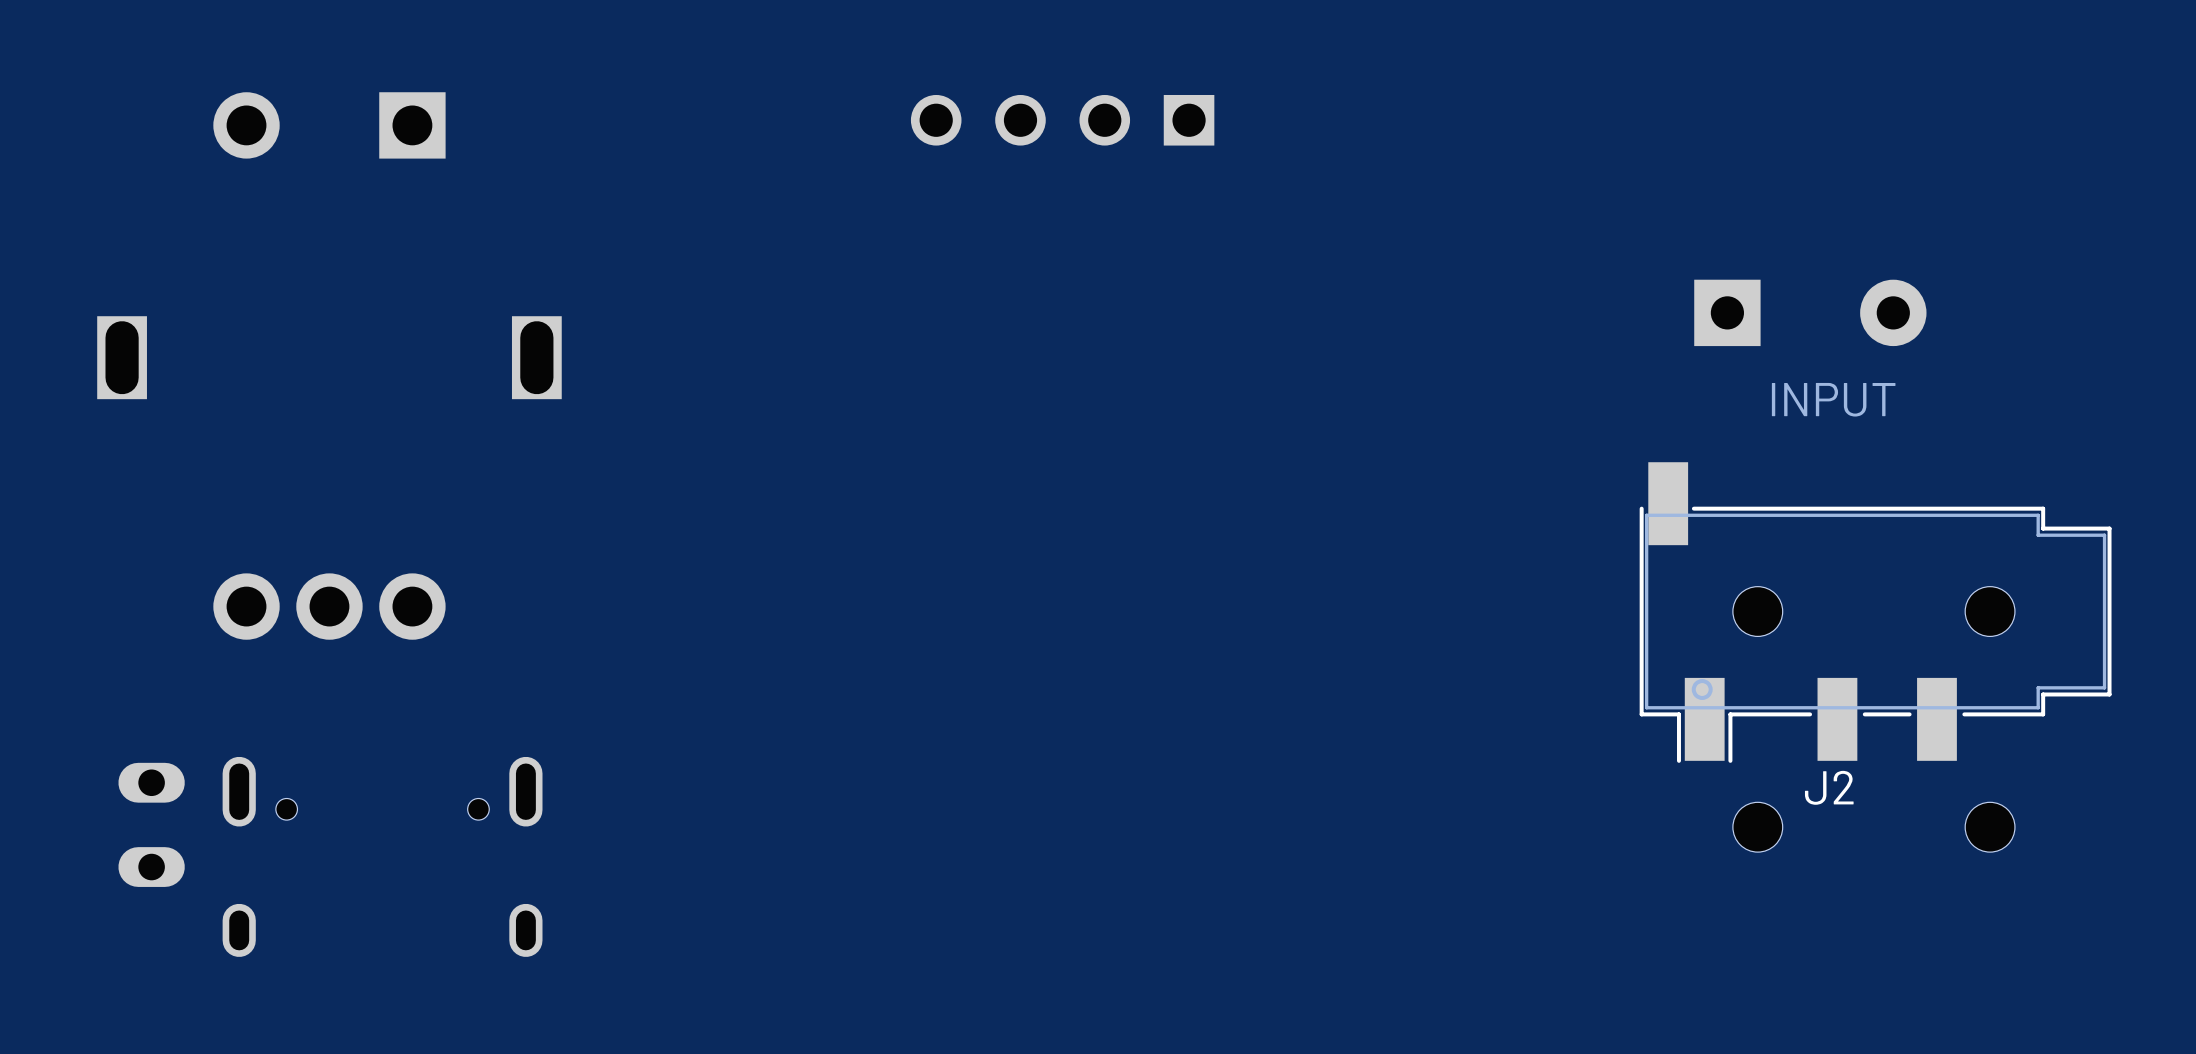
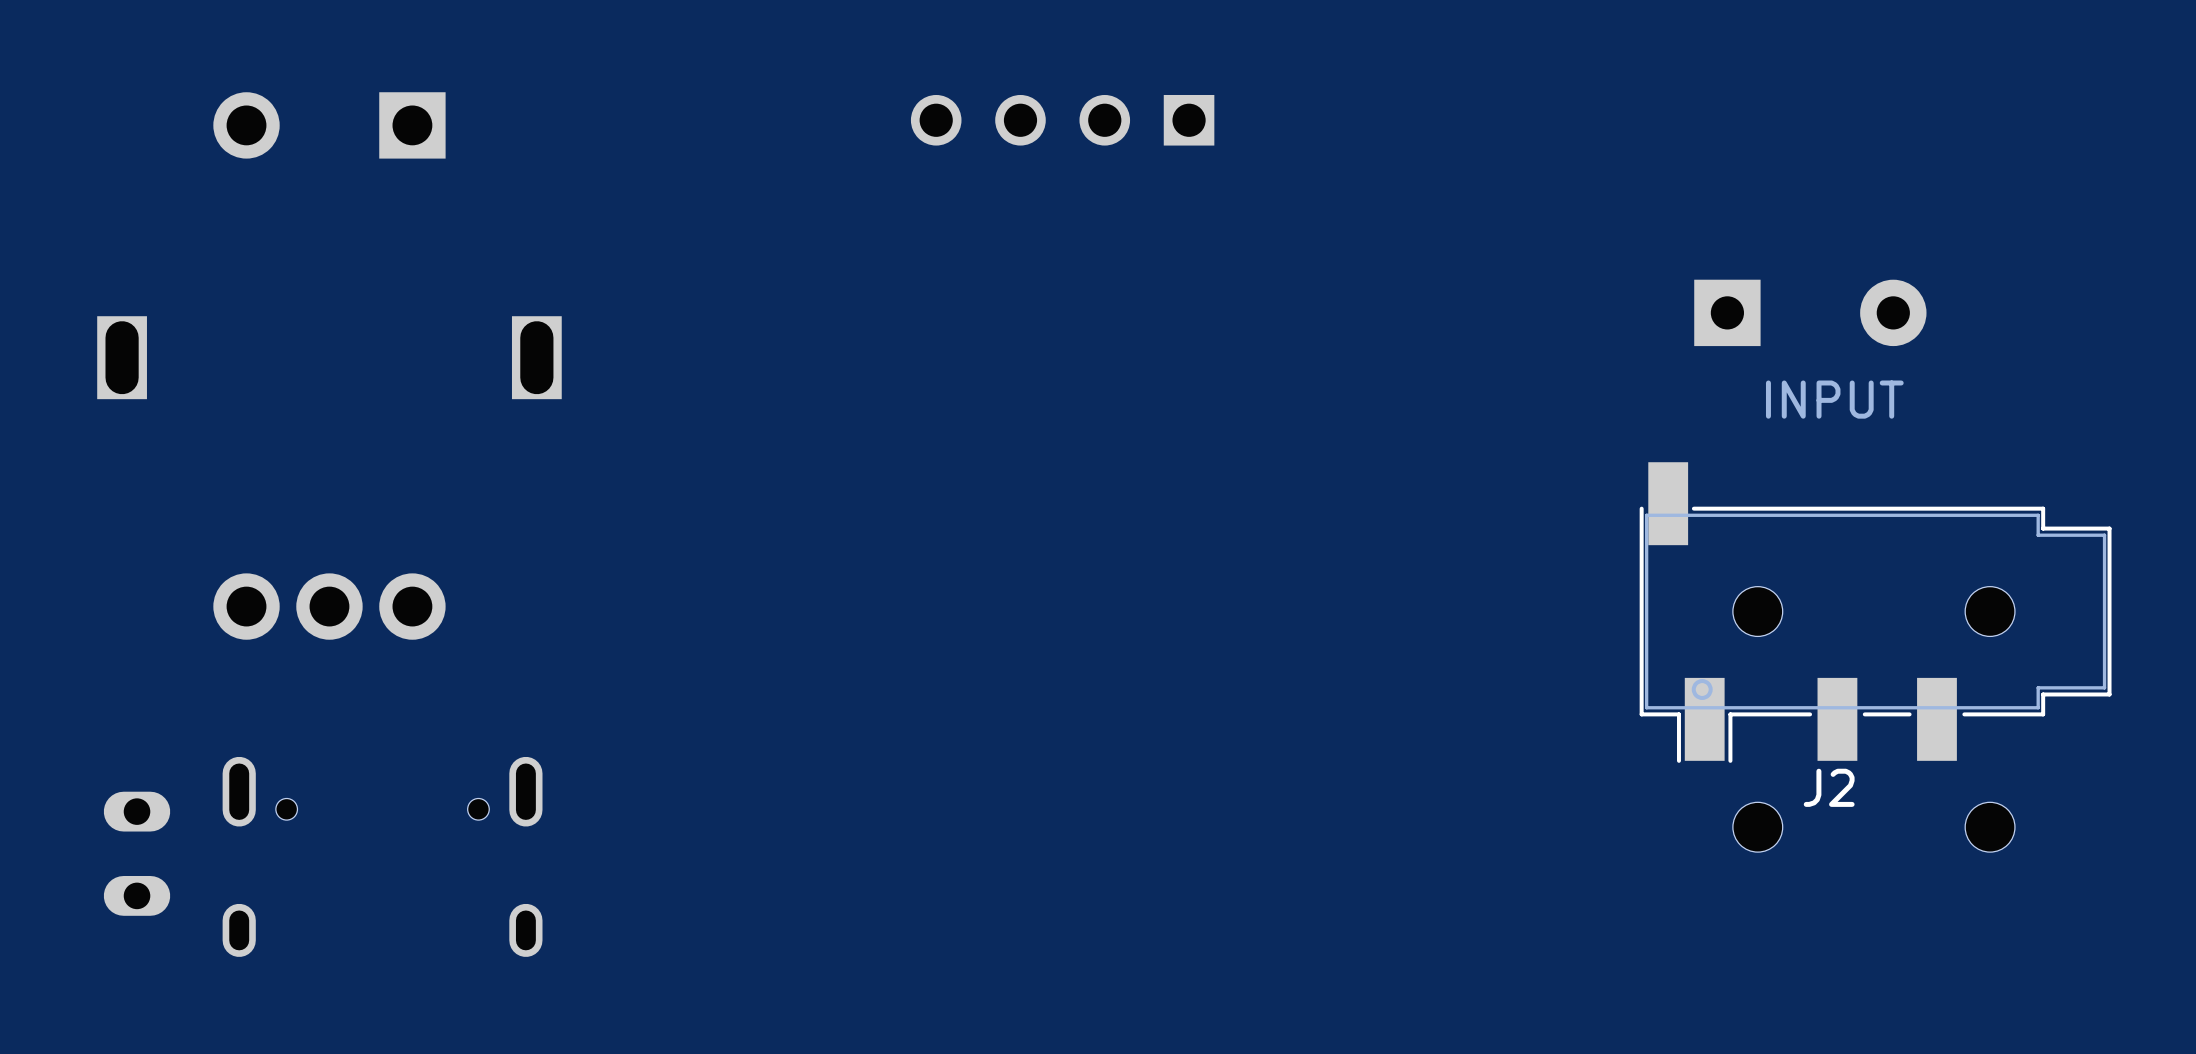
part position: (151, 824) -> (137, 853)

